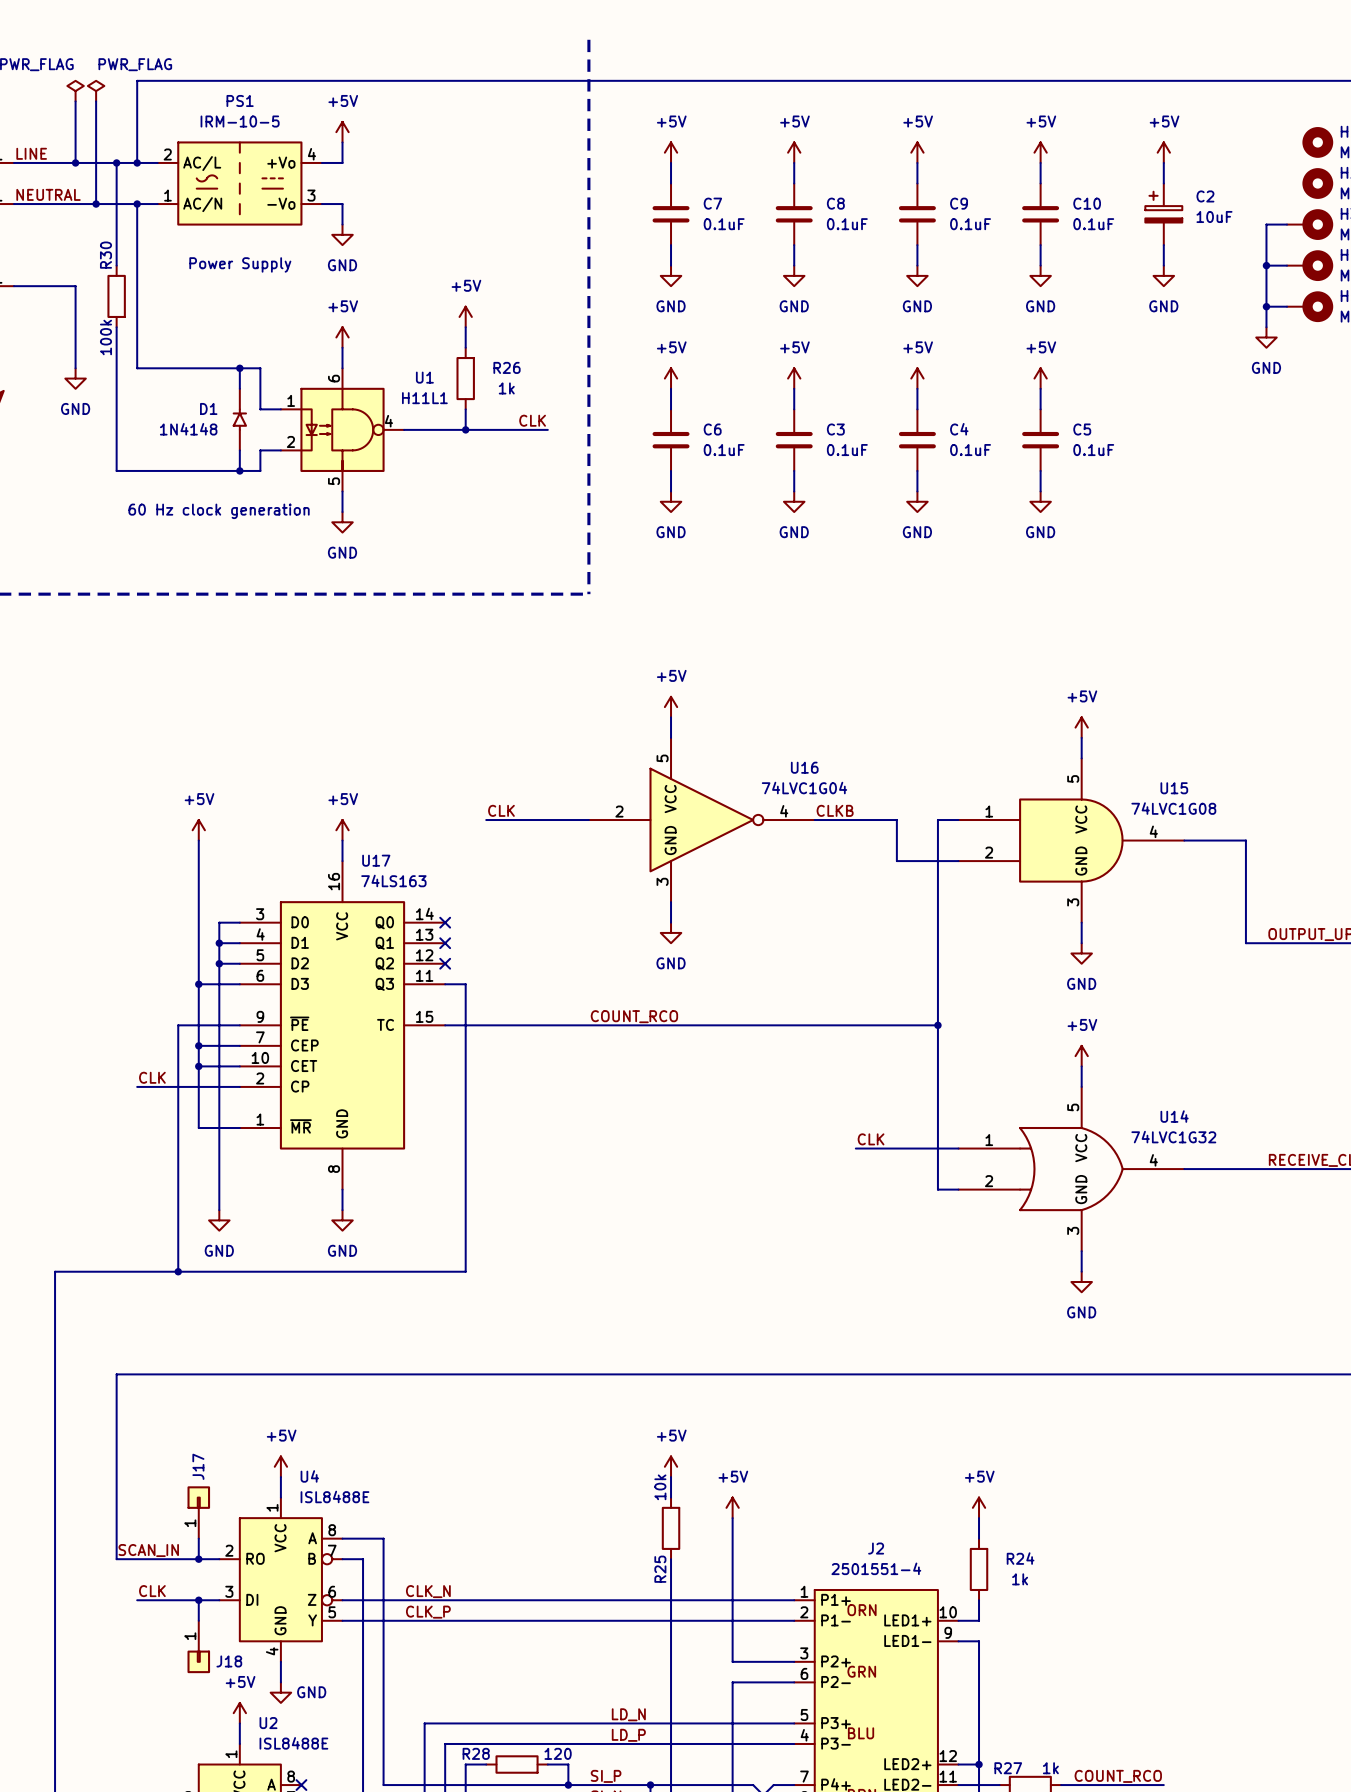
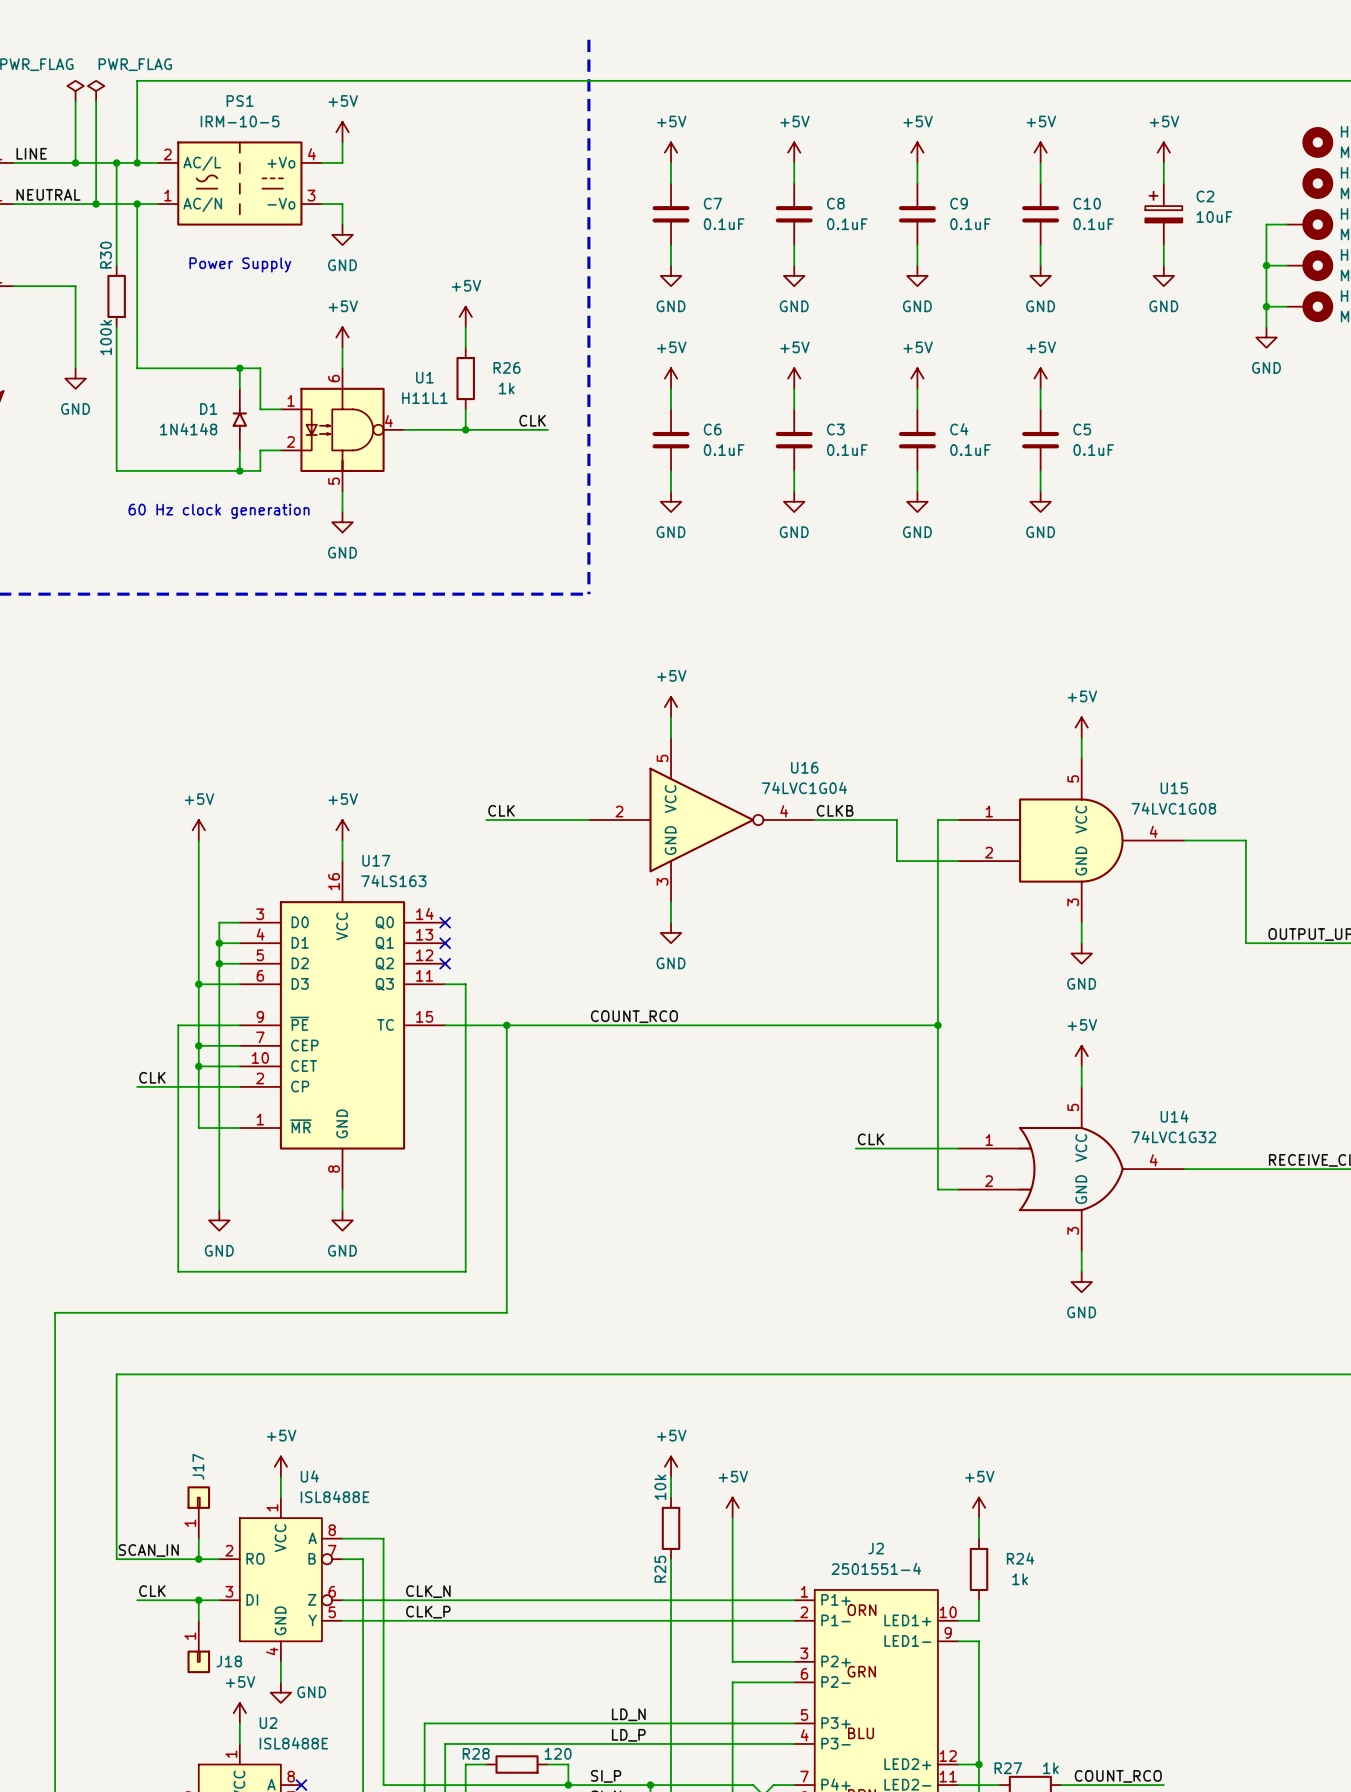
junction: none -> (506, 1025)
wire: (178, 1271) (55, 1271) (55, 1312) -> (506, 1025) (506, 1312) (55, 1312)
junction: (178, 1271) -> none

